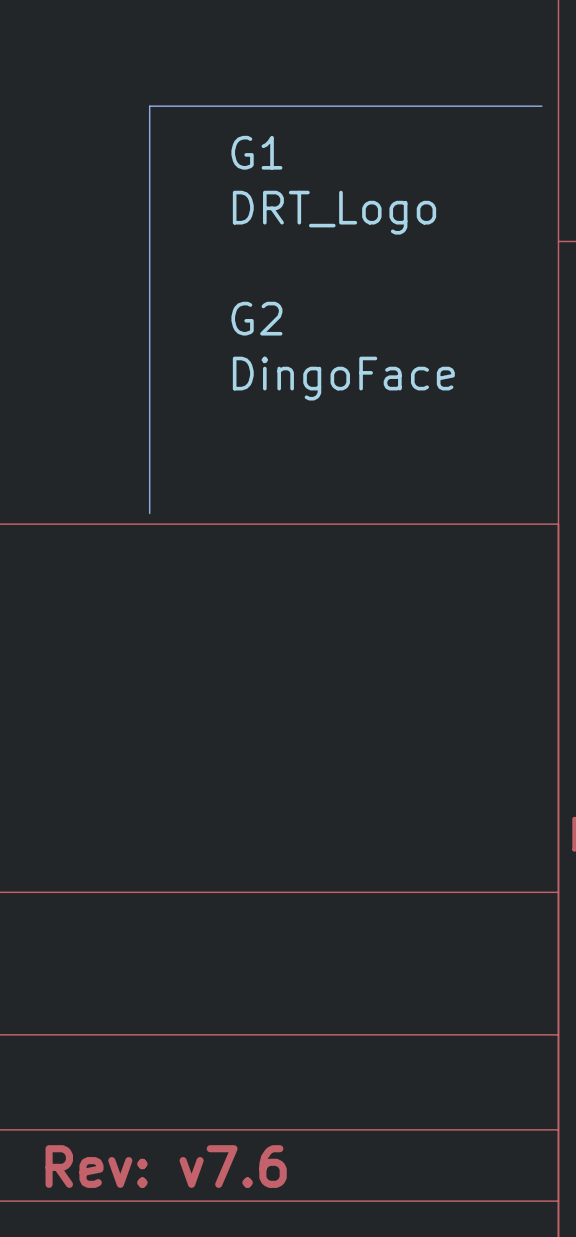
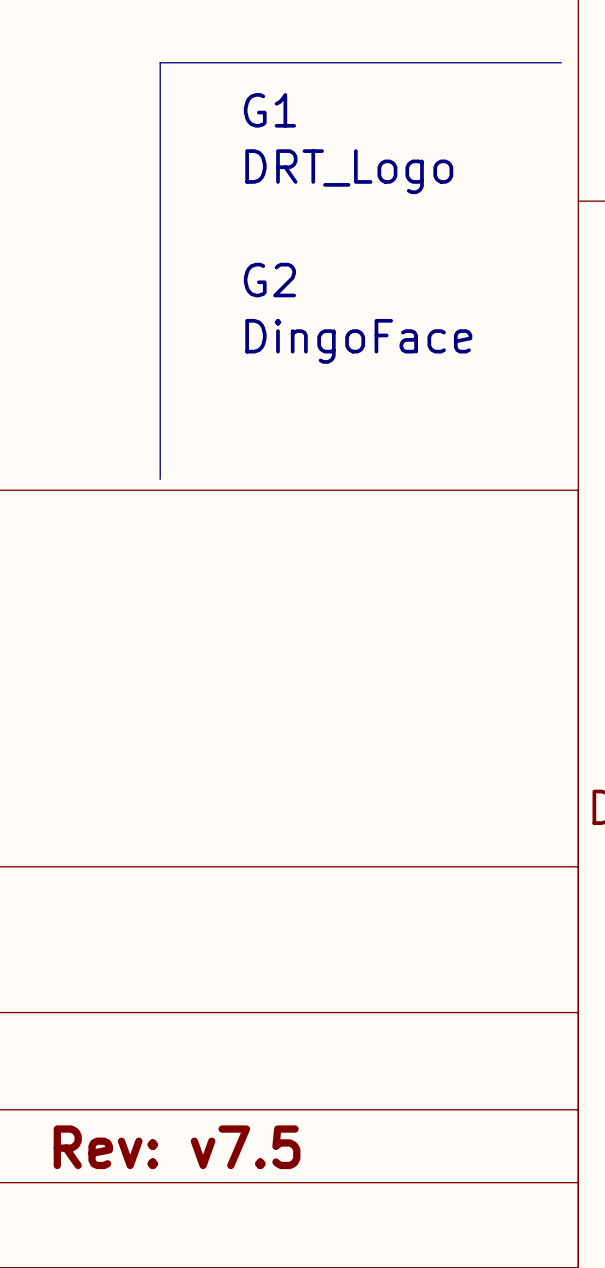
title block: Rev: v7.6 (166, 1166) -> Rev: v7.5 (177, 1147)

